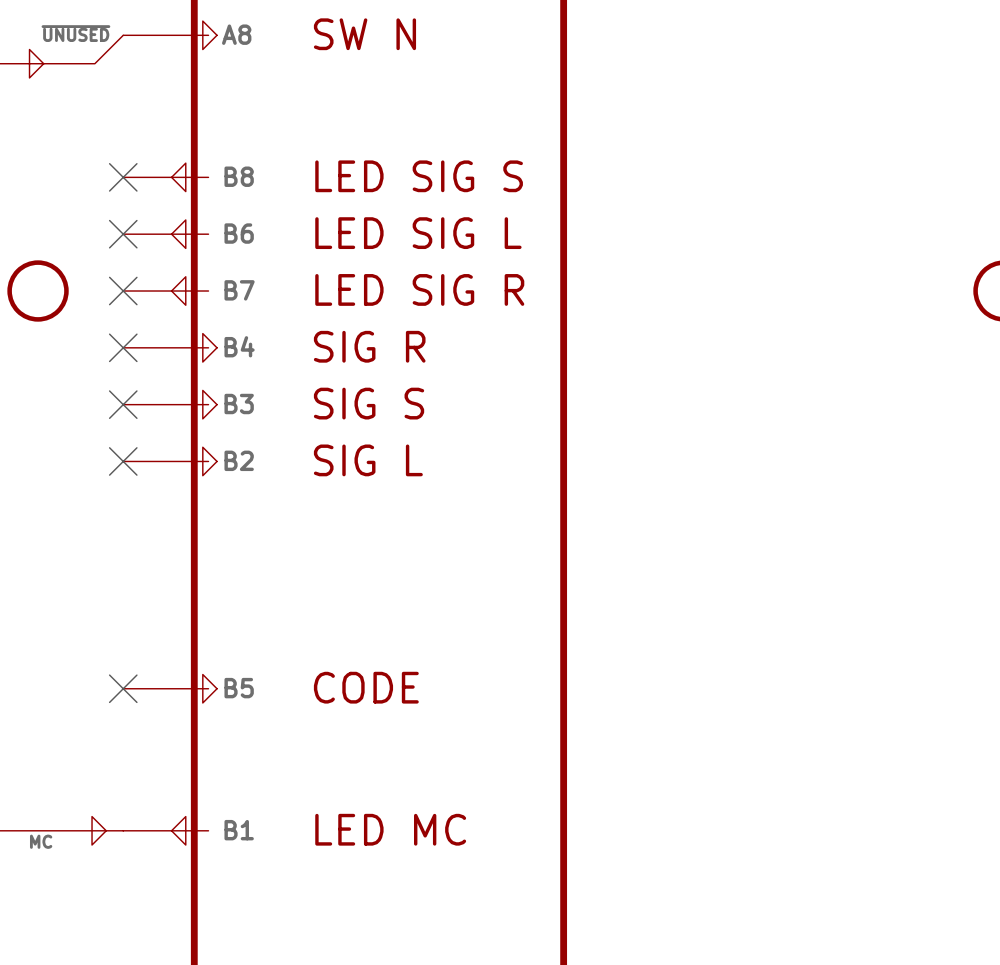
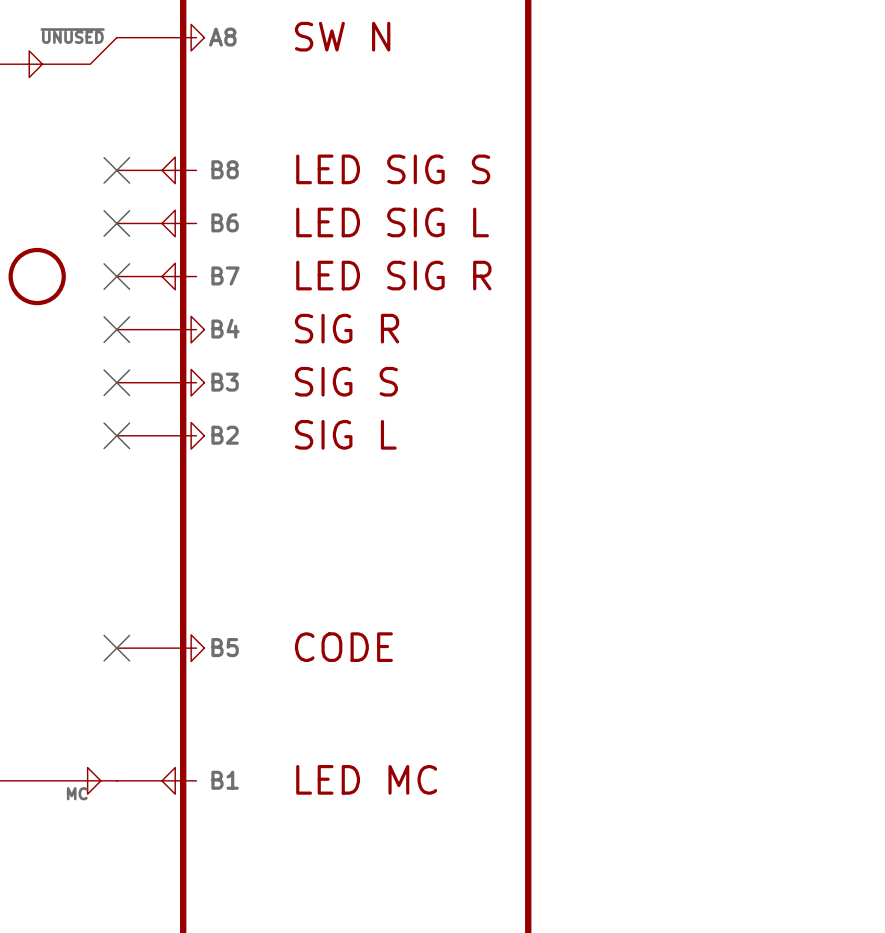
part value position: MC (41, 841) -> MC (77, 793)

